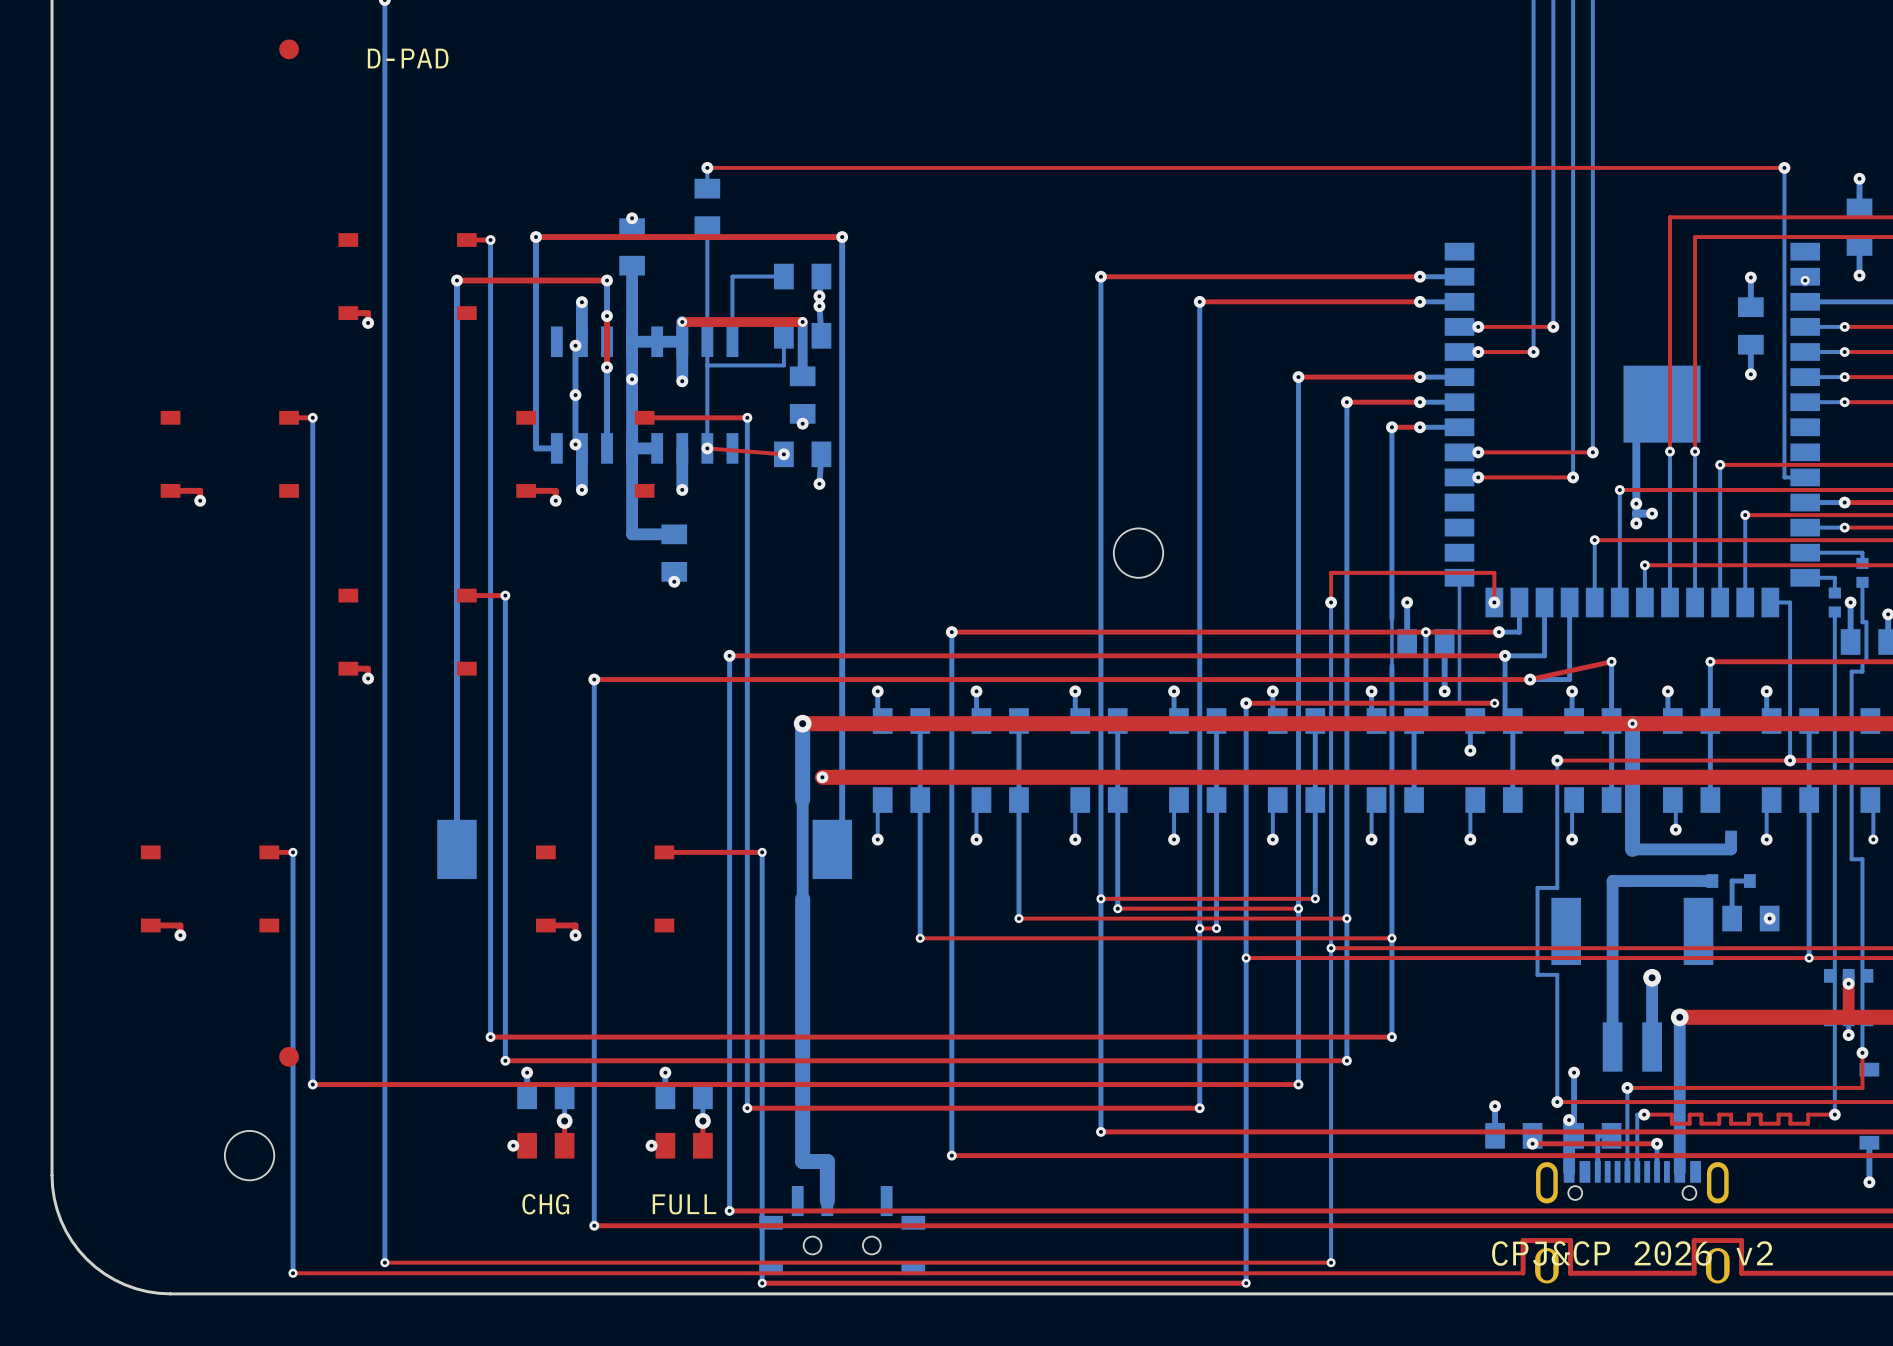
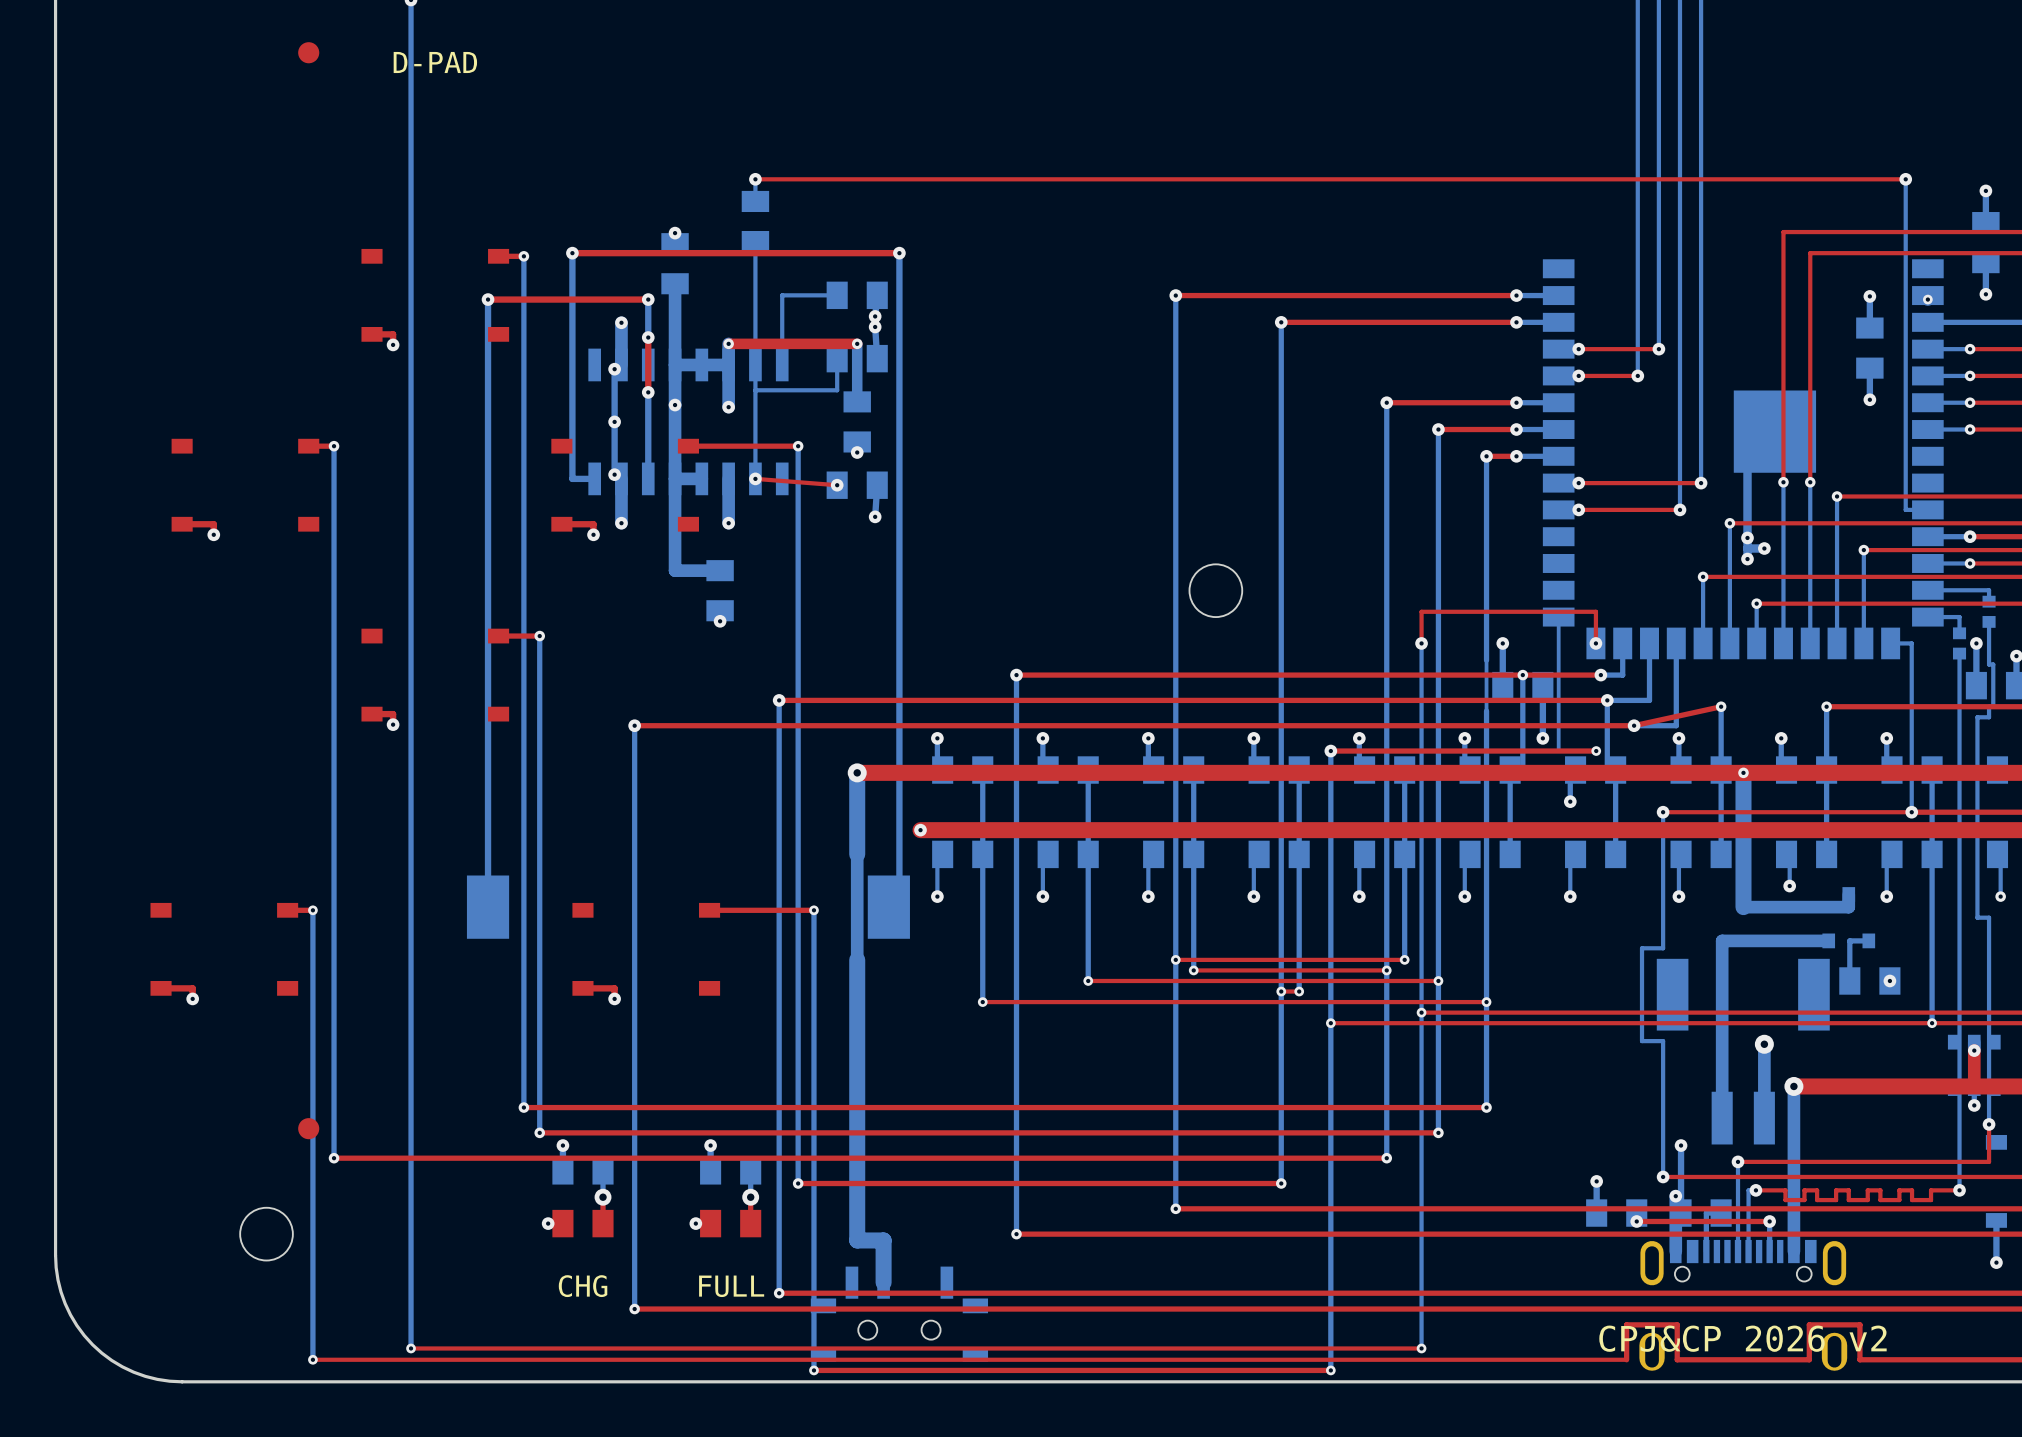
top track: (822, 777) (861, 777) -> none
via position: (822, 777) -> (920, 830)

